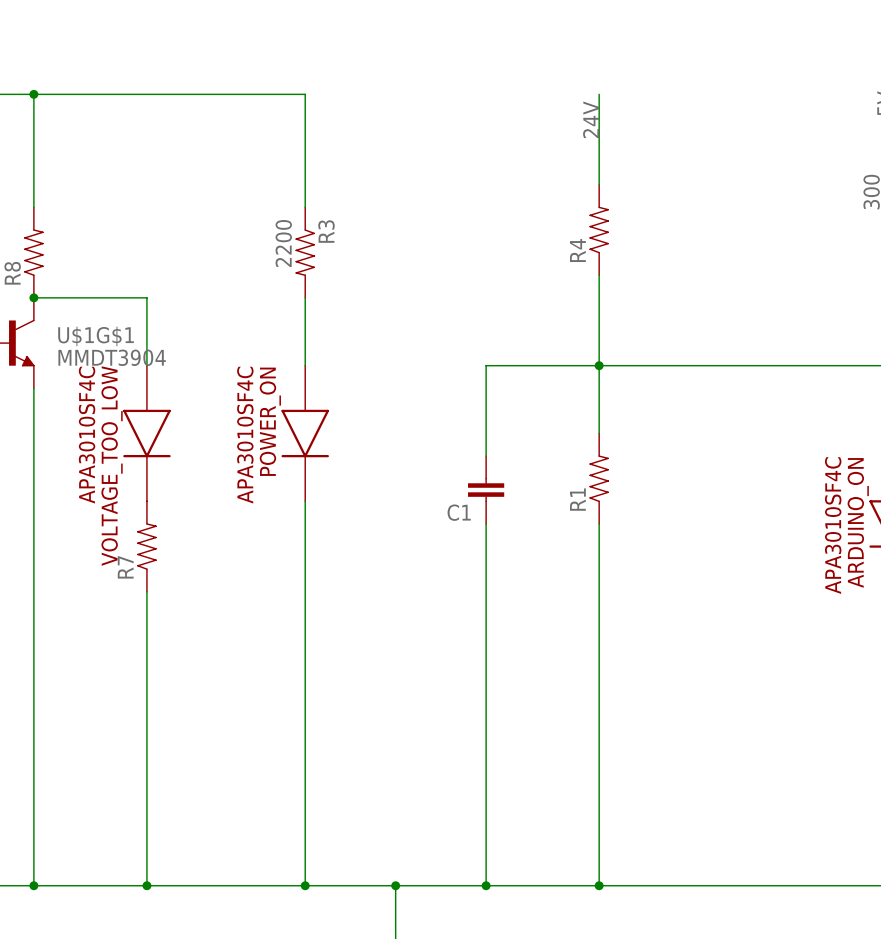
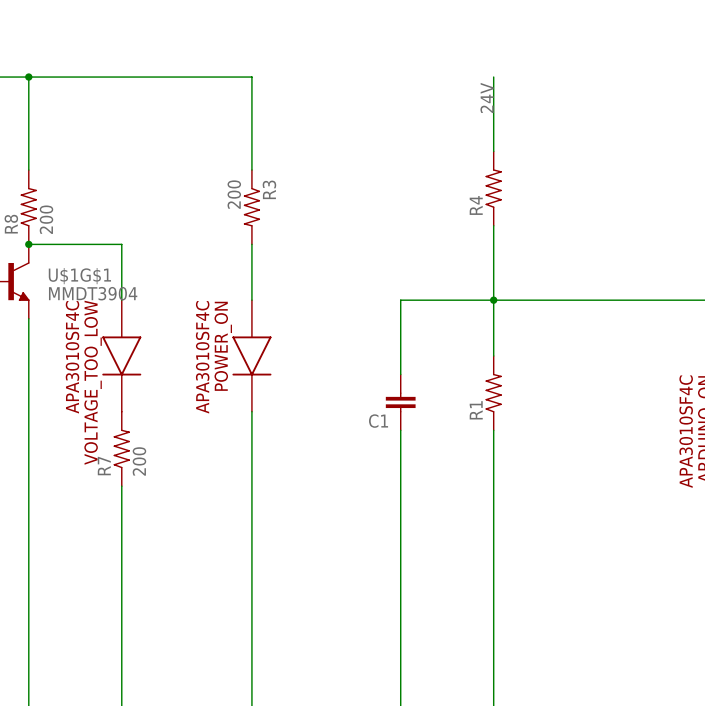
R3 value: 2200 (283, 243) -> 200 (234, 194)
R8 value: none -> 200 (46, 219)
R7 value: none -> 200 (139, 461)

